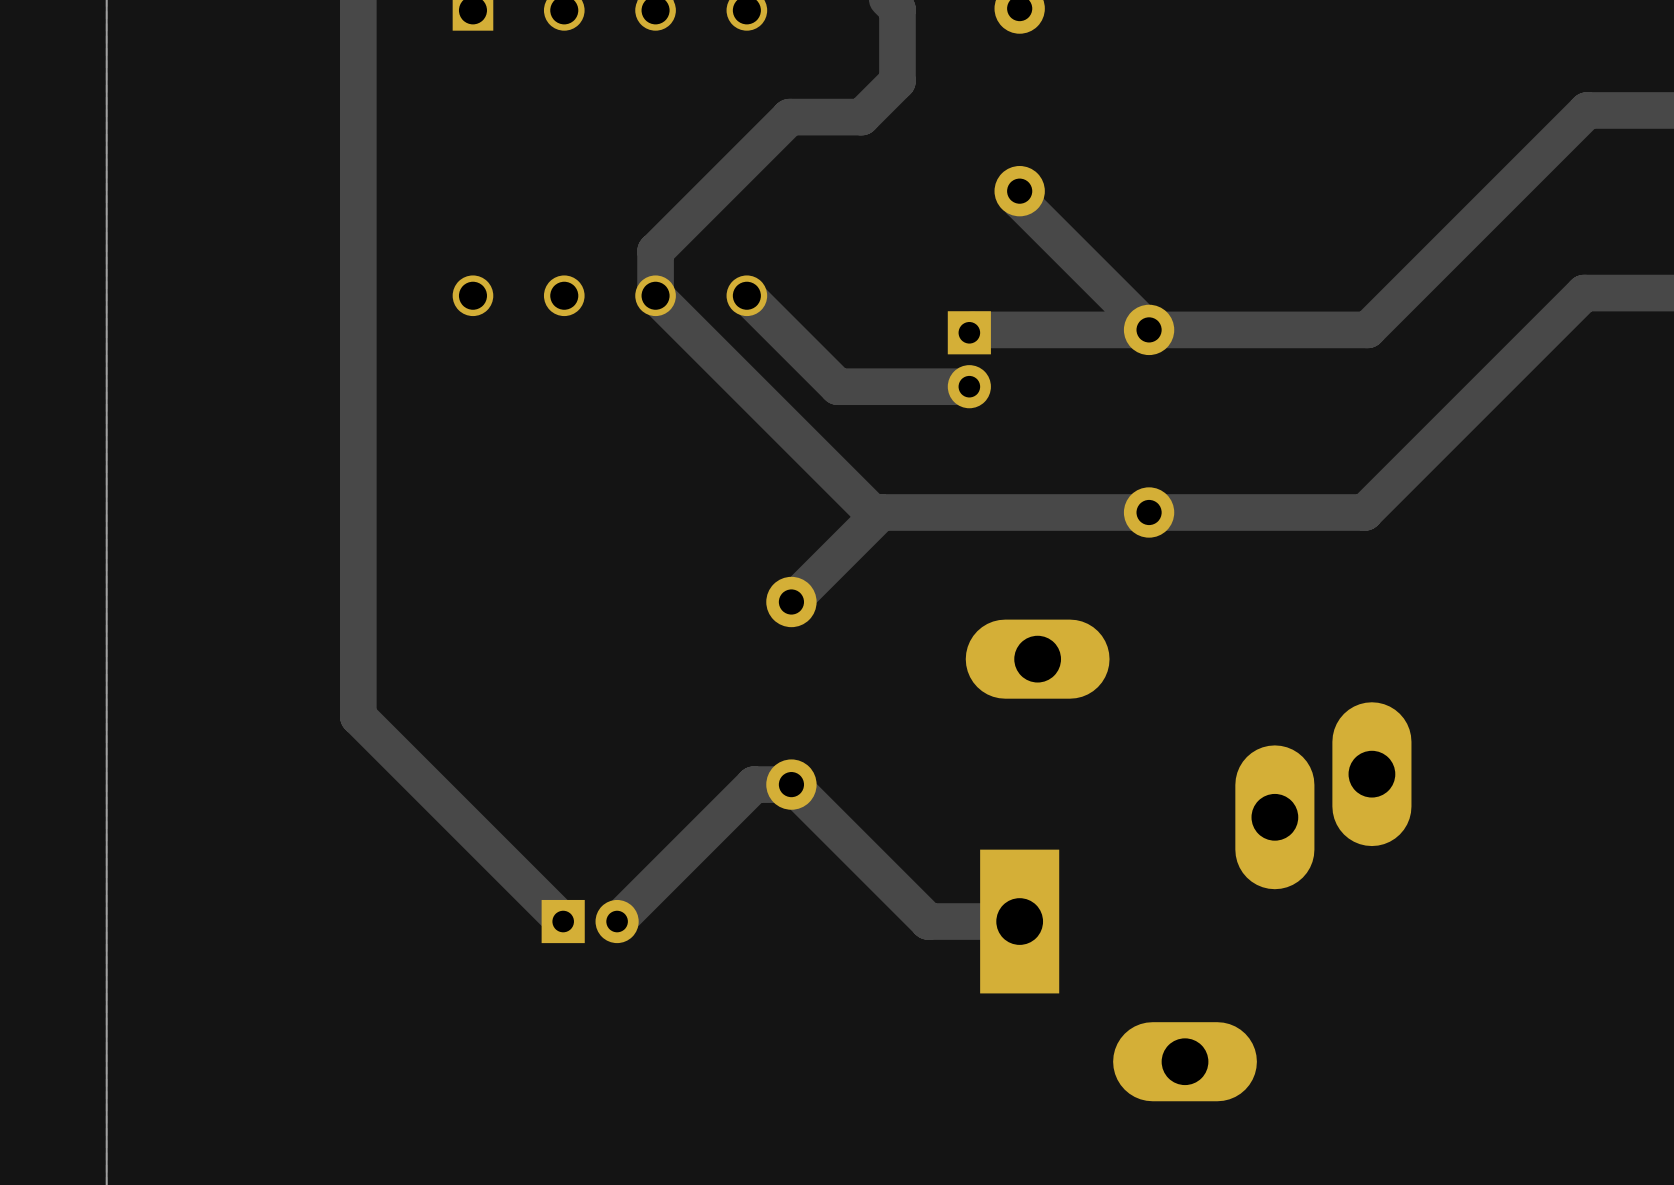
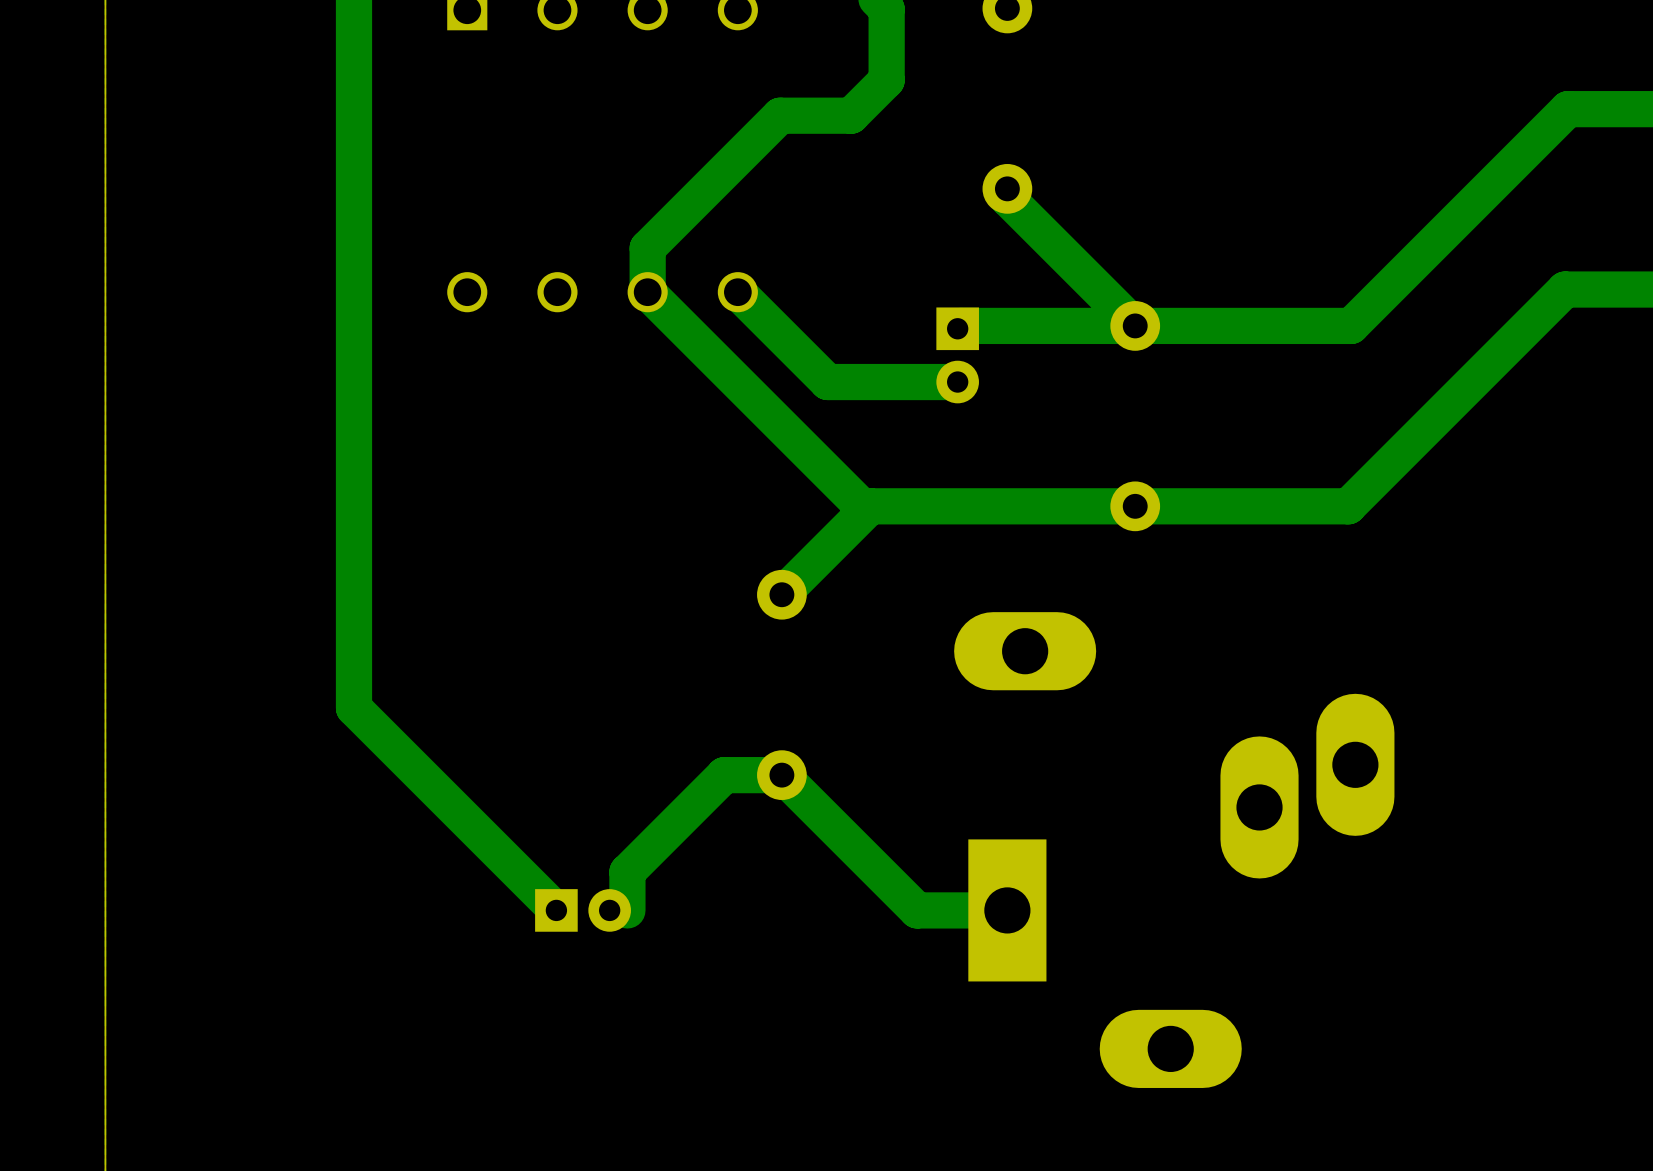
track: (754, 784) (617, 921) -> (744, 775) (724, 775) (627, 872) (627, 910)

